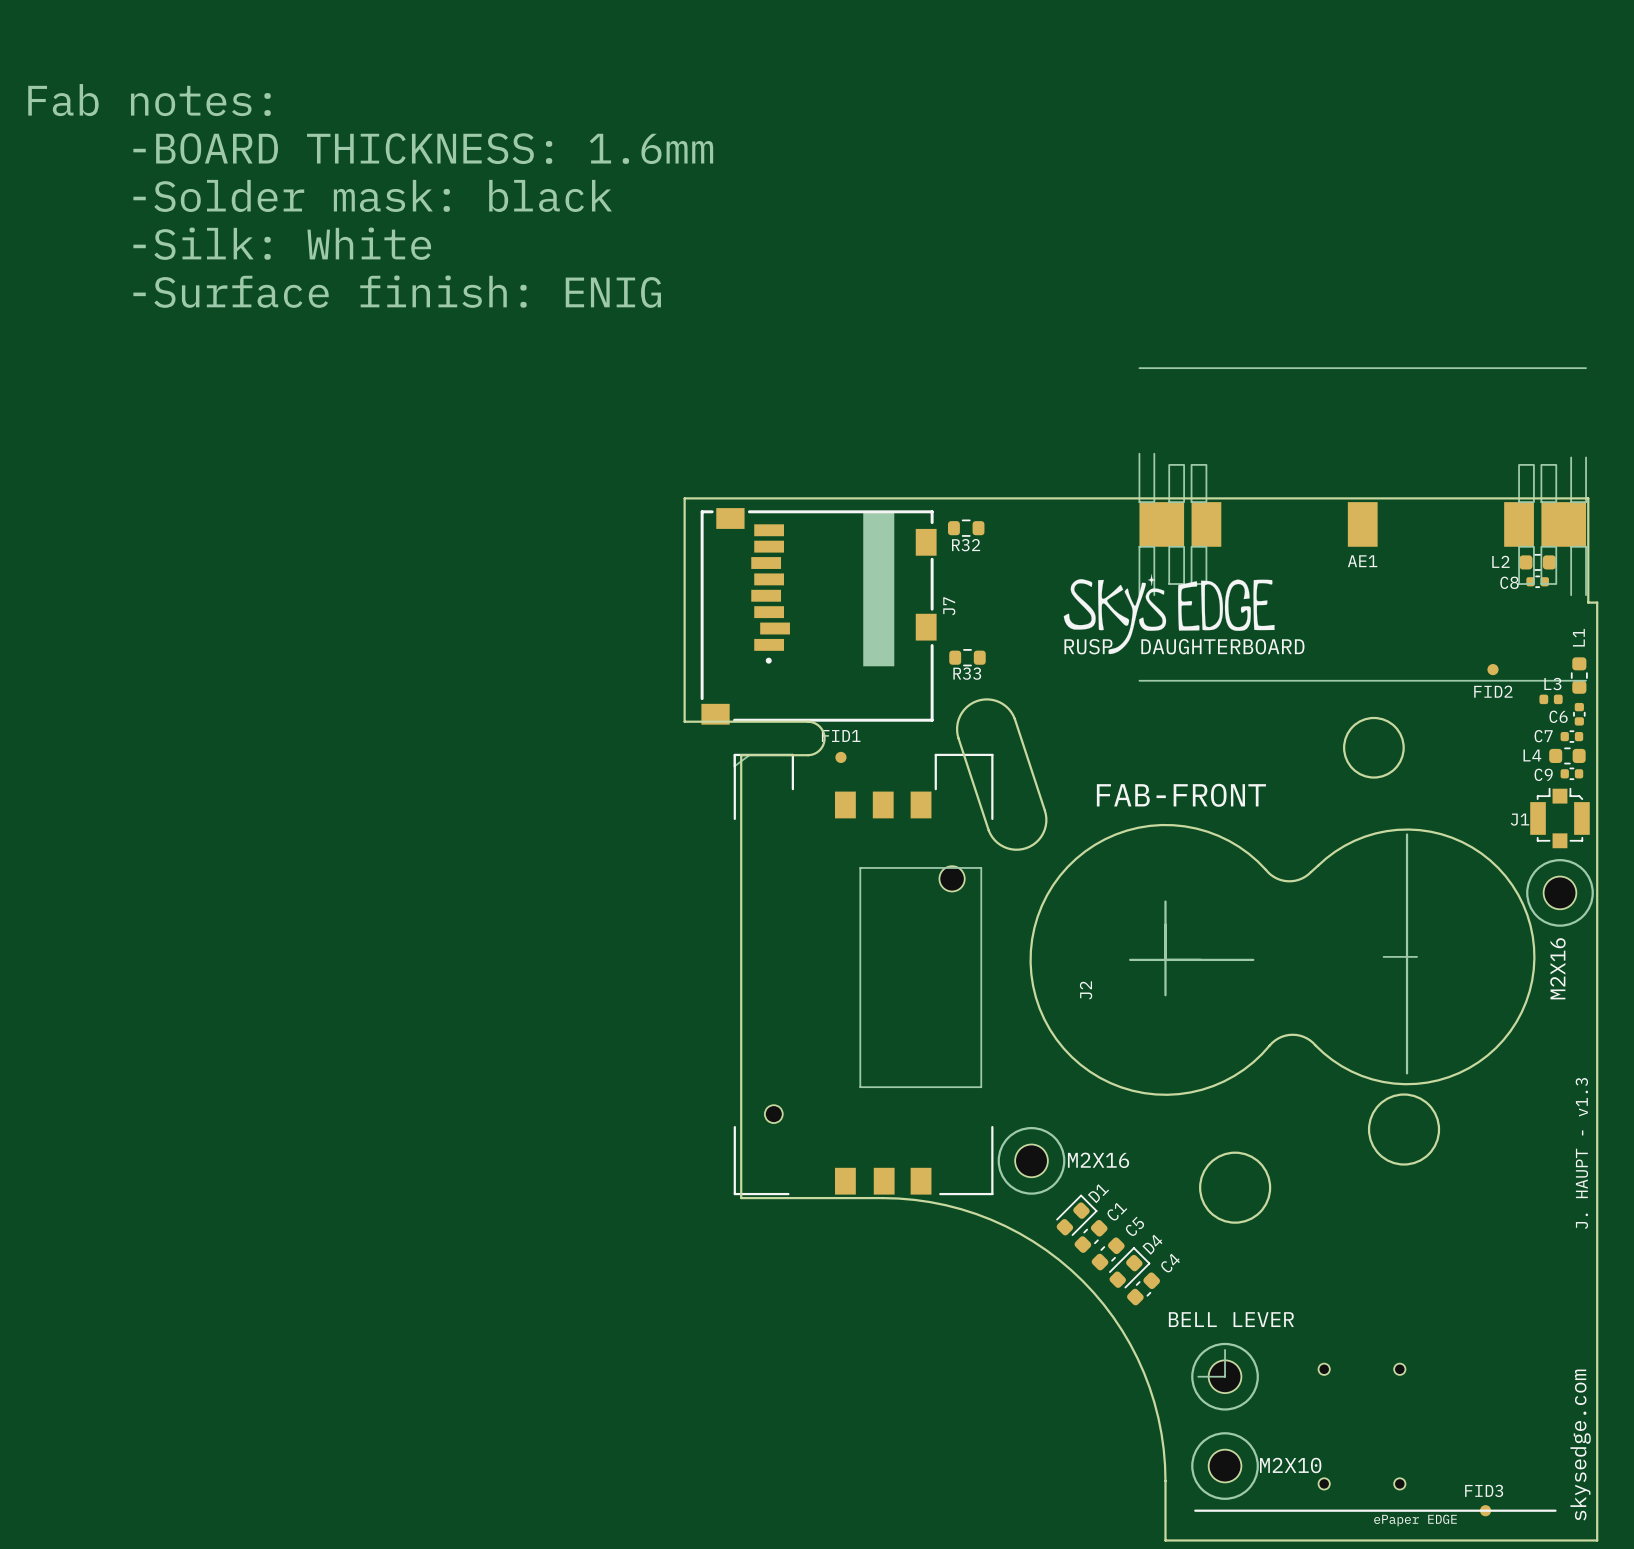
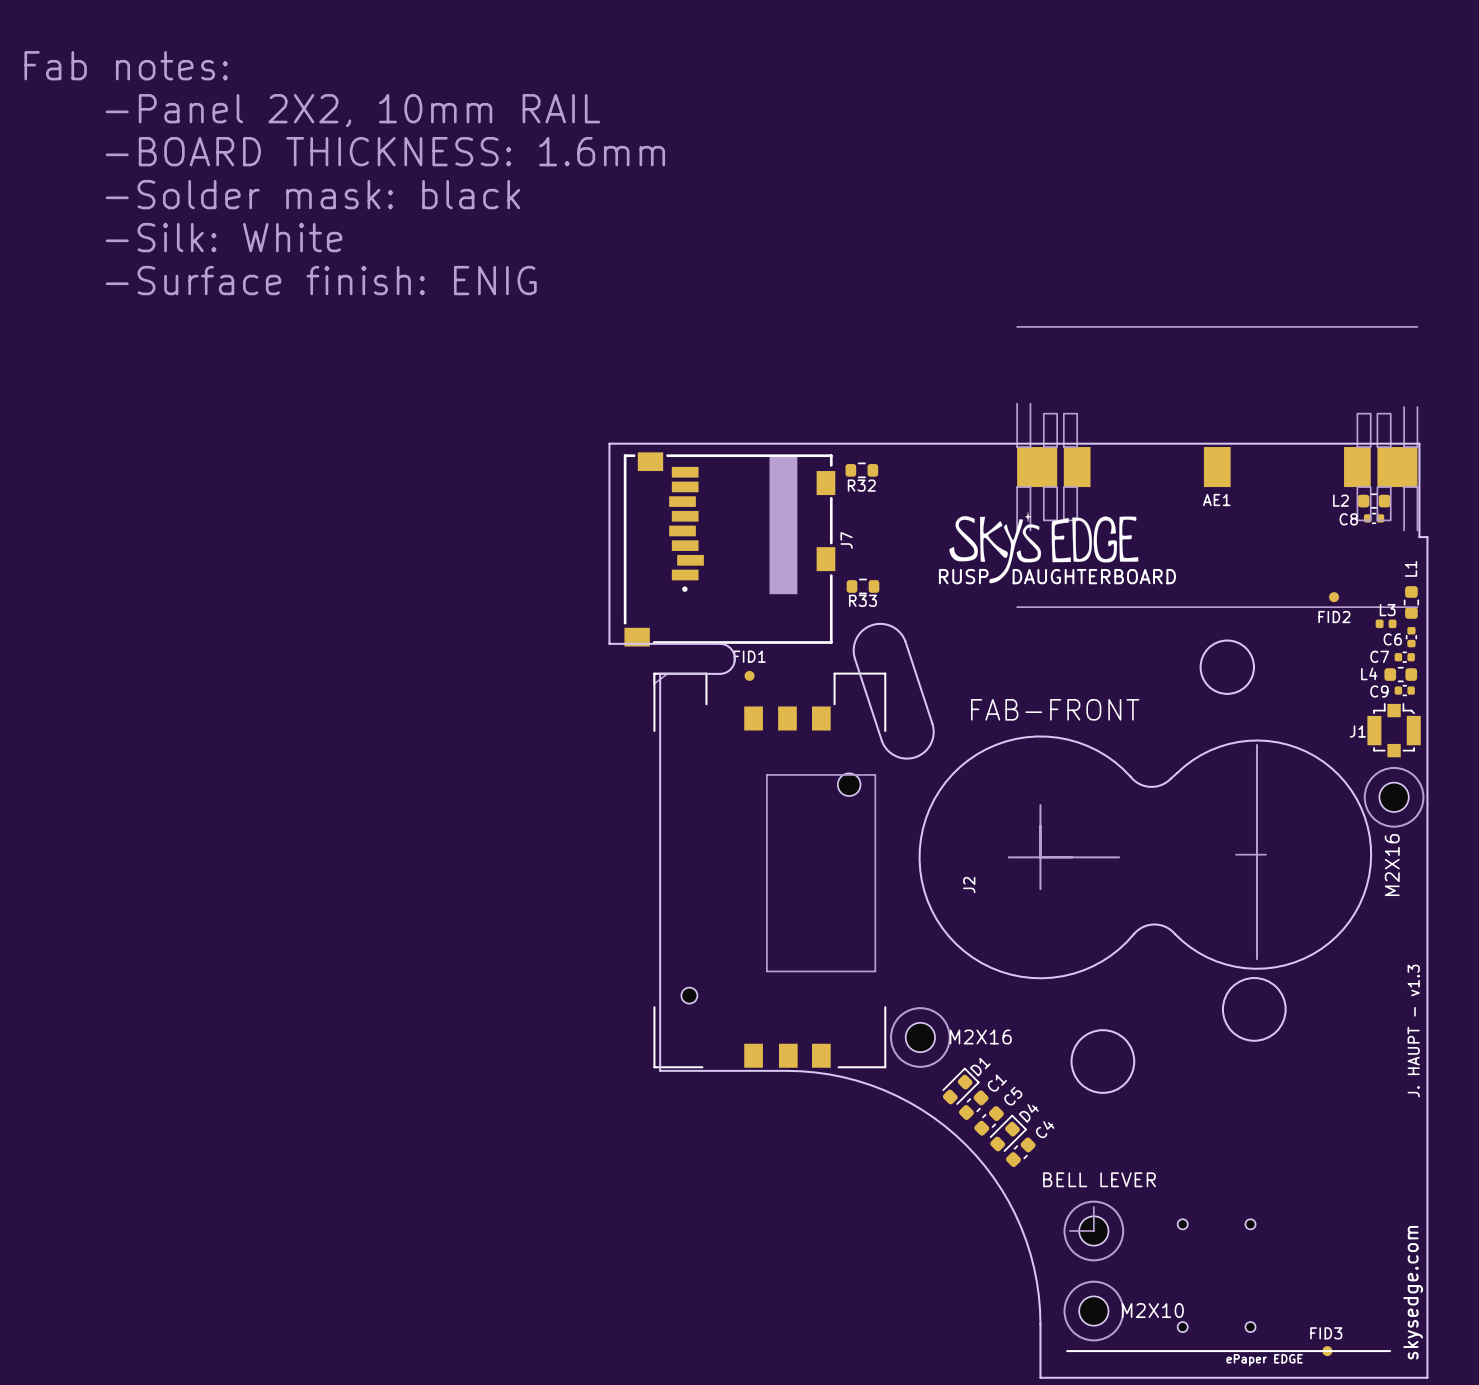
text position: Fab notes: (149, 100) -> Fab notes: (126, 65)
text: none -> -Panel 2X2, 10mm RAIL (353, 110)
text position: -BOARD THICKNESS: 1.6mm (423, 148) -> -BOARD THICKNESS: 1.6mm (385, 151)
text position: -Solder mask: black (372, 195) -> -Solder mask: black (312, 194)
text position: -Silk: White (282, 243) -> -Silk: White (224, 237)
text position: -Surface finish: ENIG (397, 291) -> -Surface finish: ENIG (321, 280)

